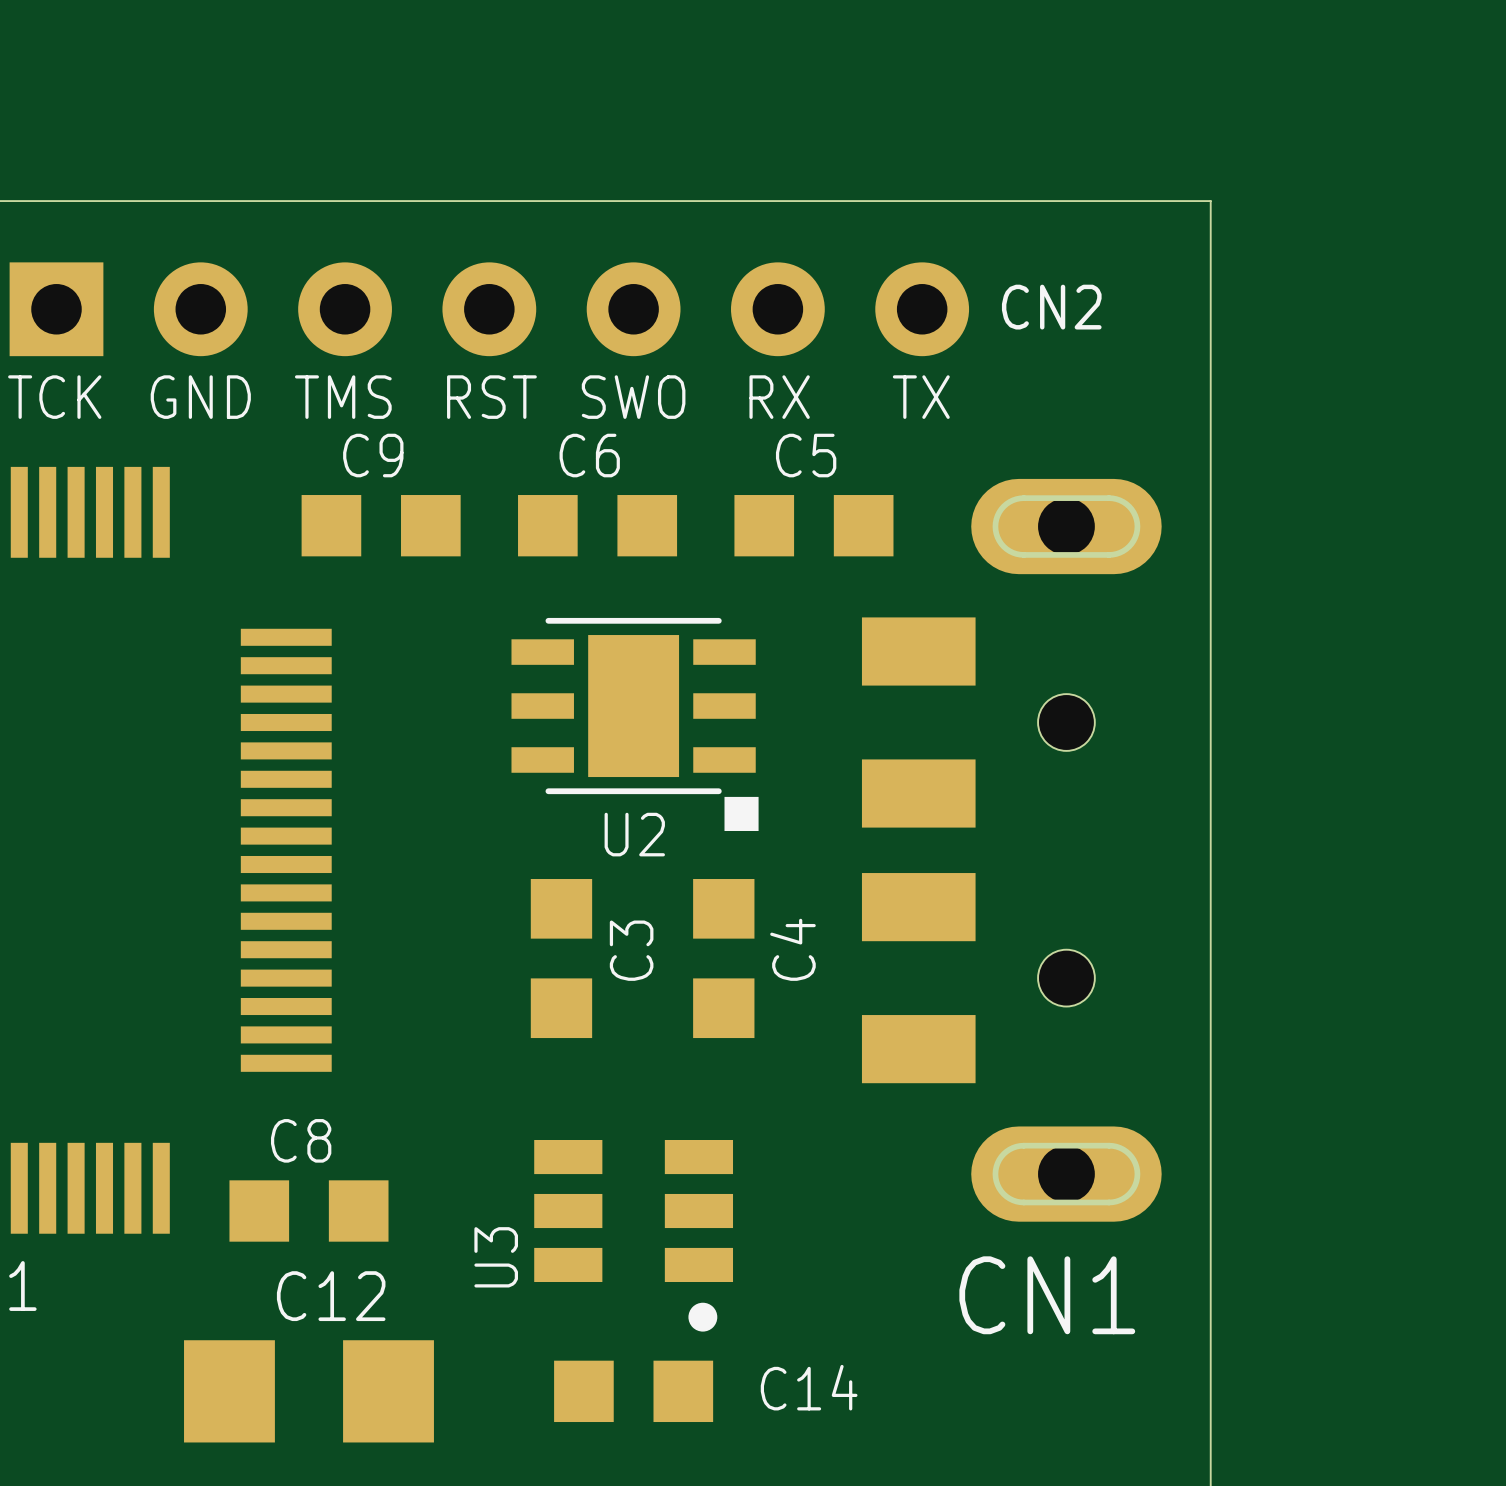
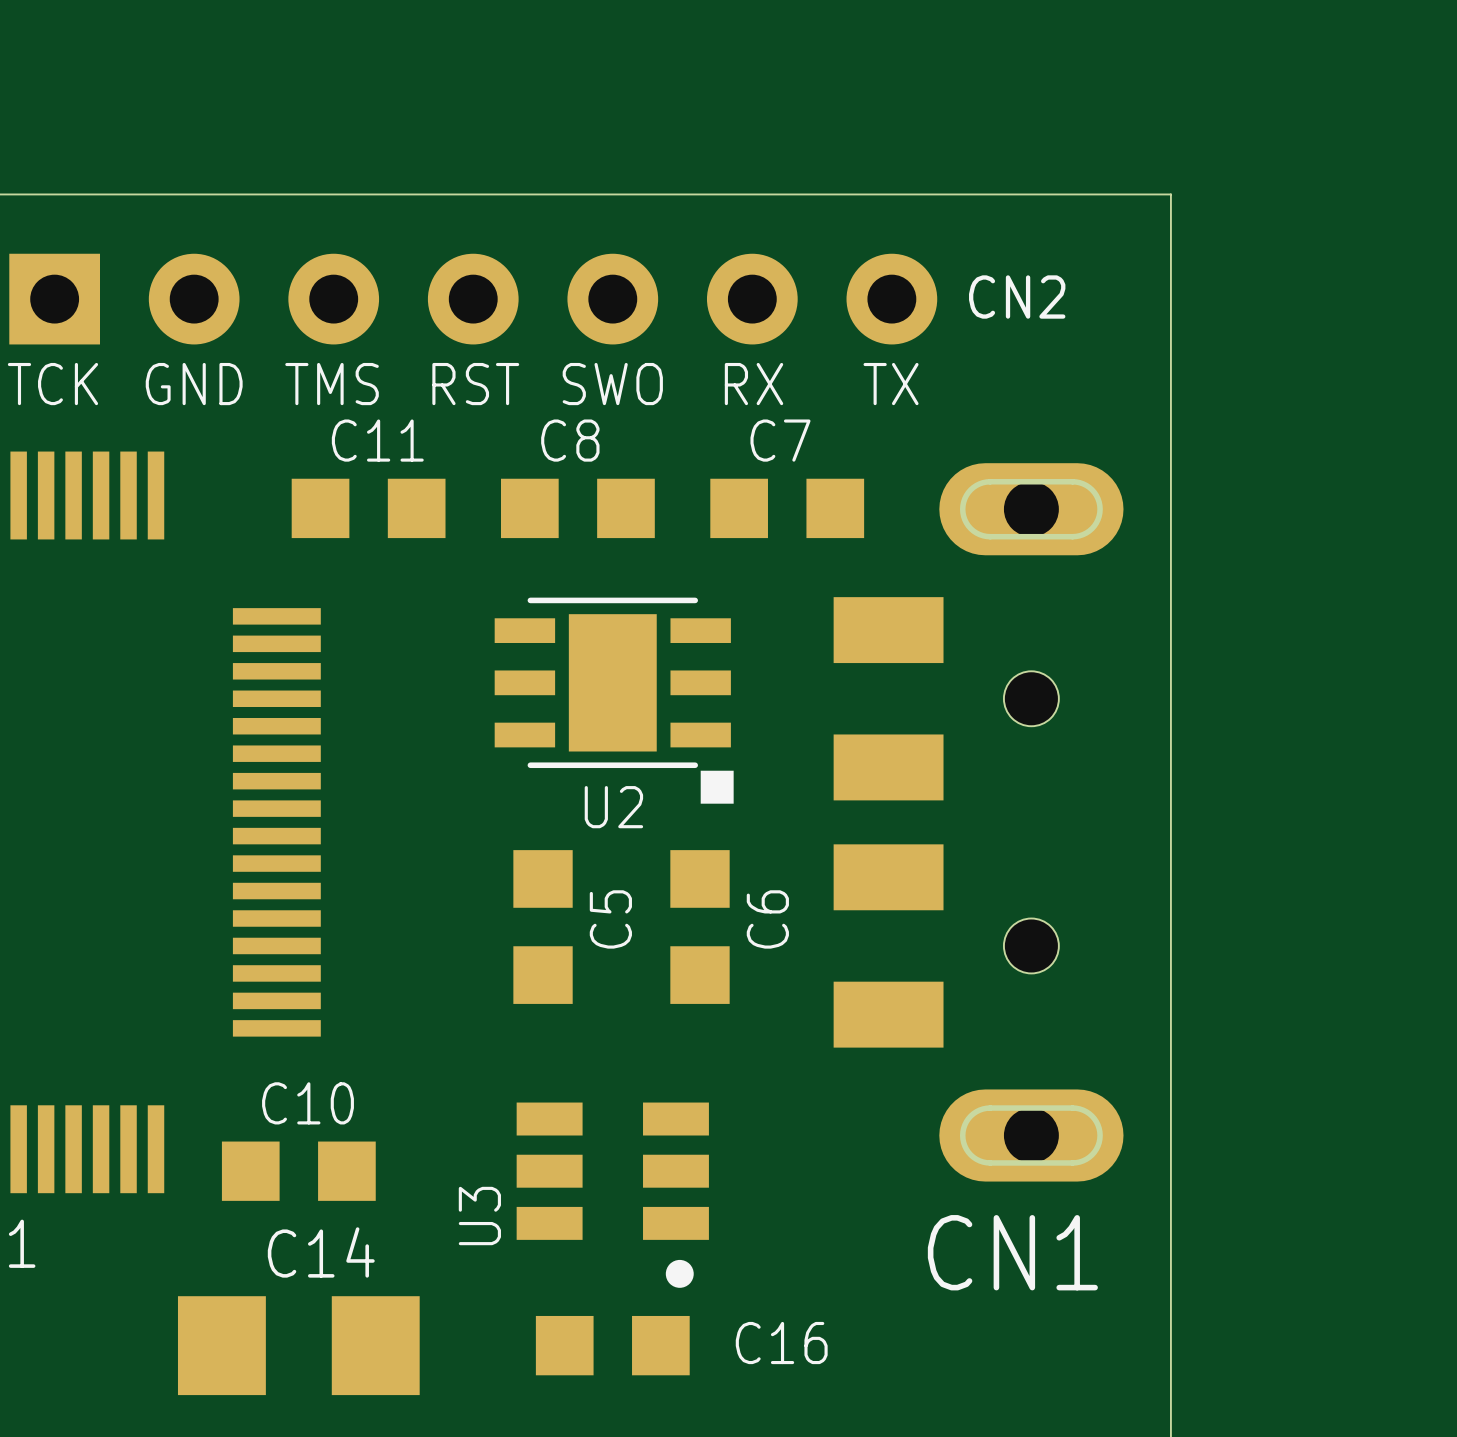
C9 name: C9 (373, 455) -> C11 (377, 440)
C6 name: C6 (589, 455) -> C8 (570, 440)
C5 name: C5 (806, 455) -> C7 (780, 440)
C4 name: C4 (792, 949) -> C6 (767, 919)
C3 name: C3 (631, 950) -> C5 (610, 919)
C8 name: C8 (301, 1140) -> C10 (308, 1103)
C12 name: C12 (331, 1296) -> C14 (321, 1252)
C14 name: C14 (809, 1387) -> C16 (781, 1343)

